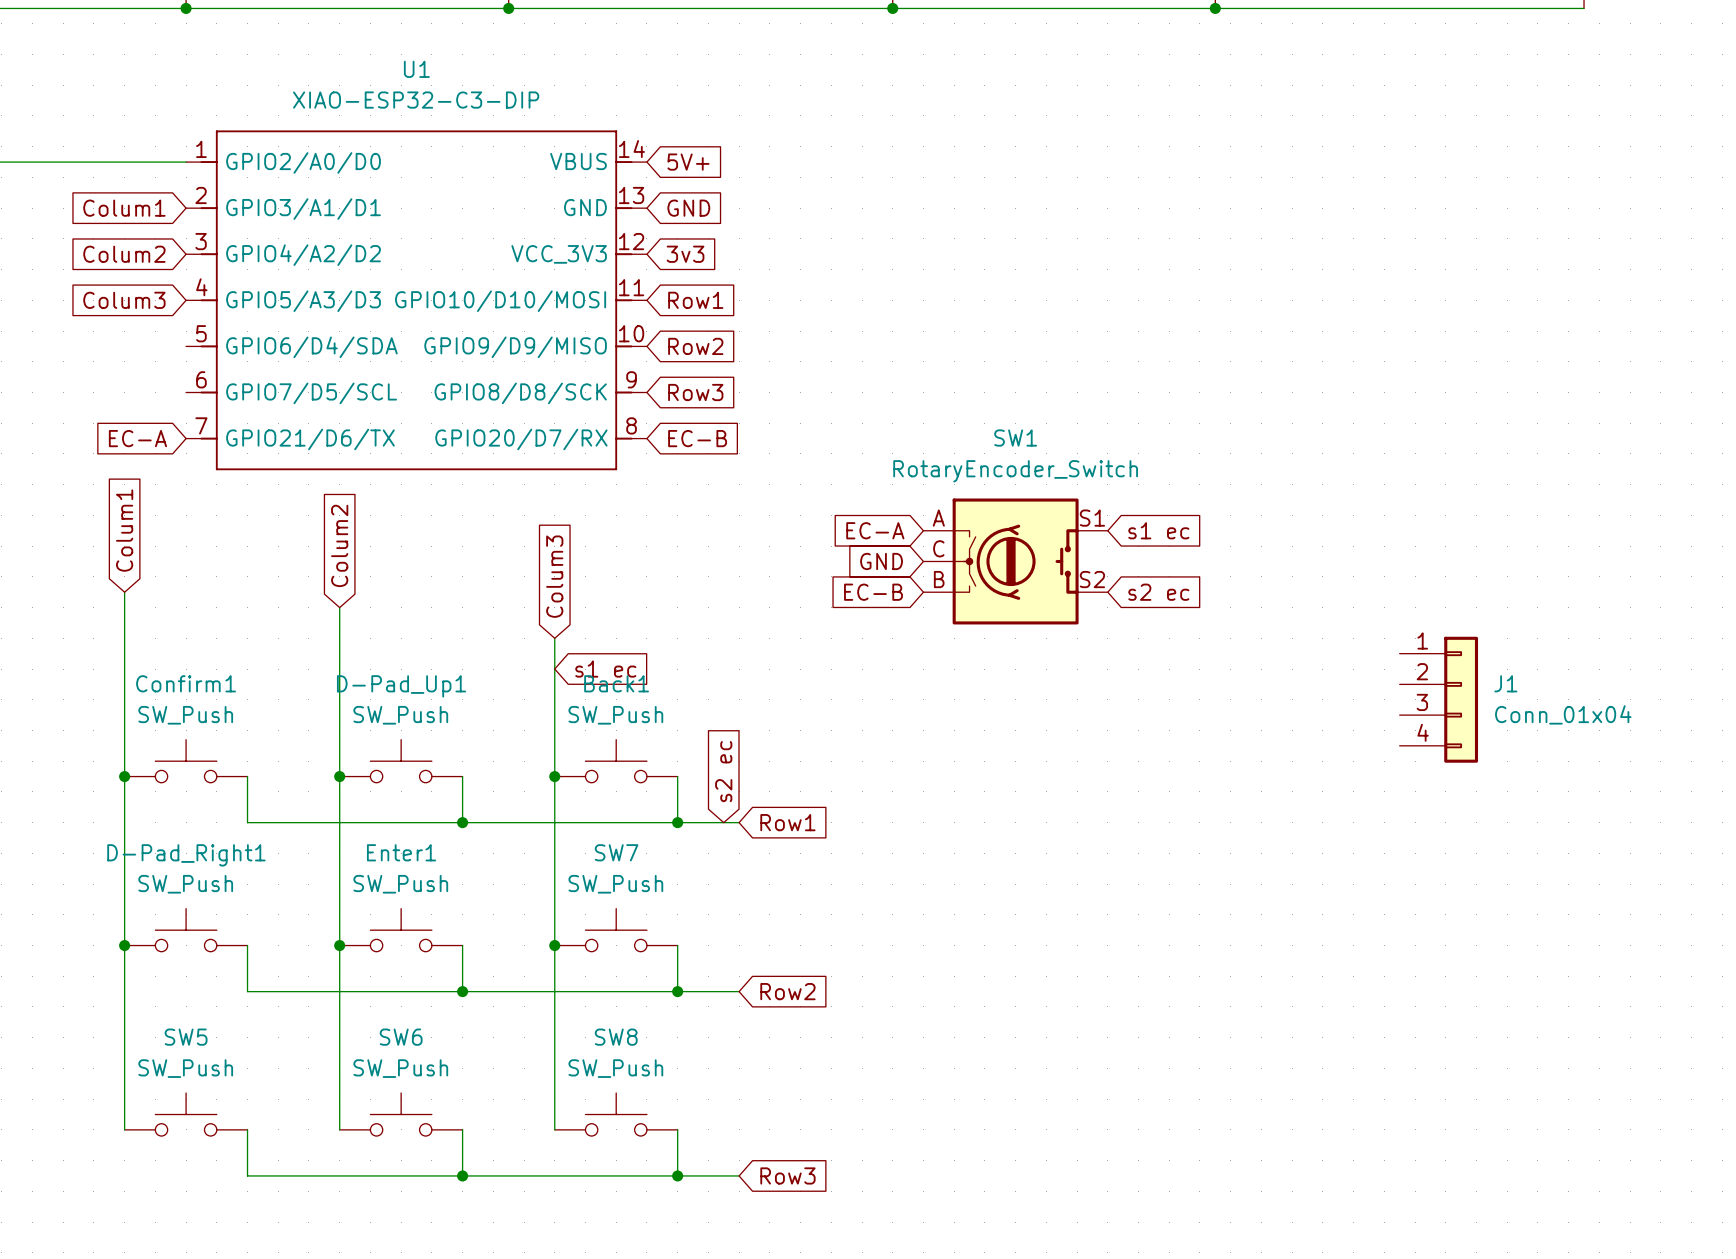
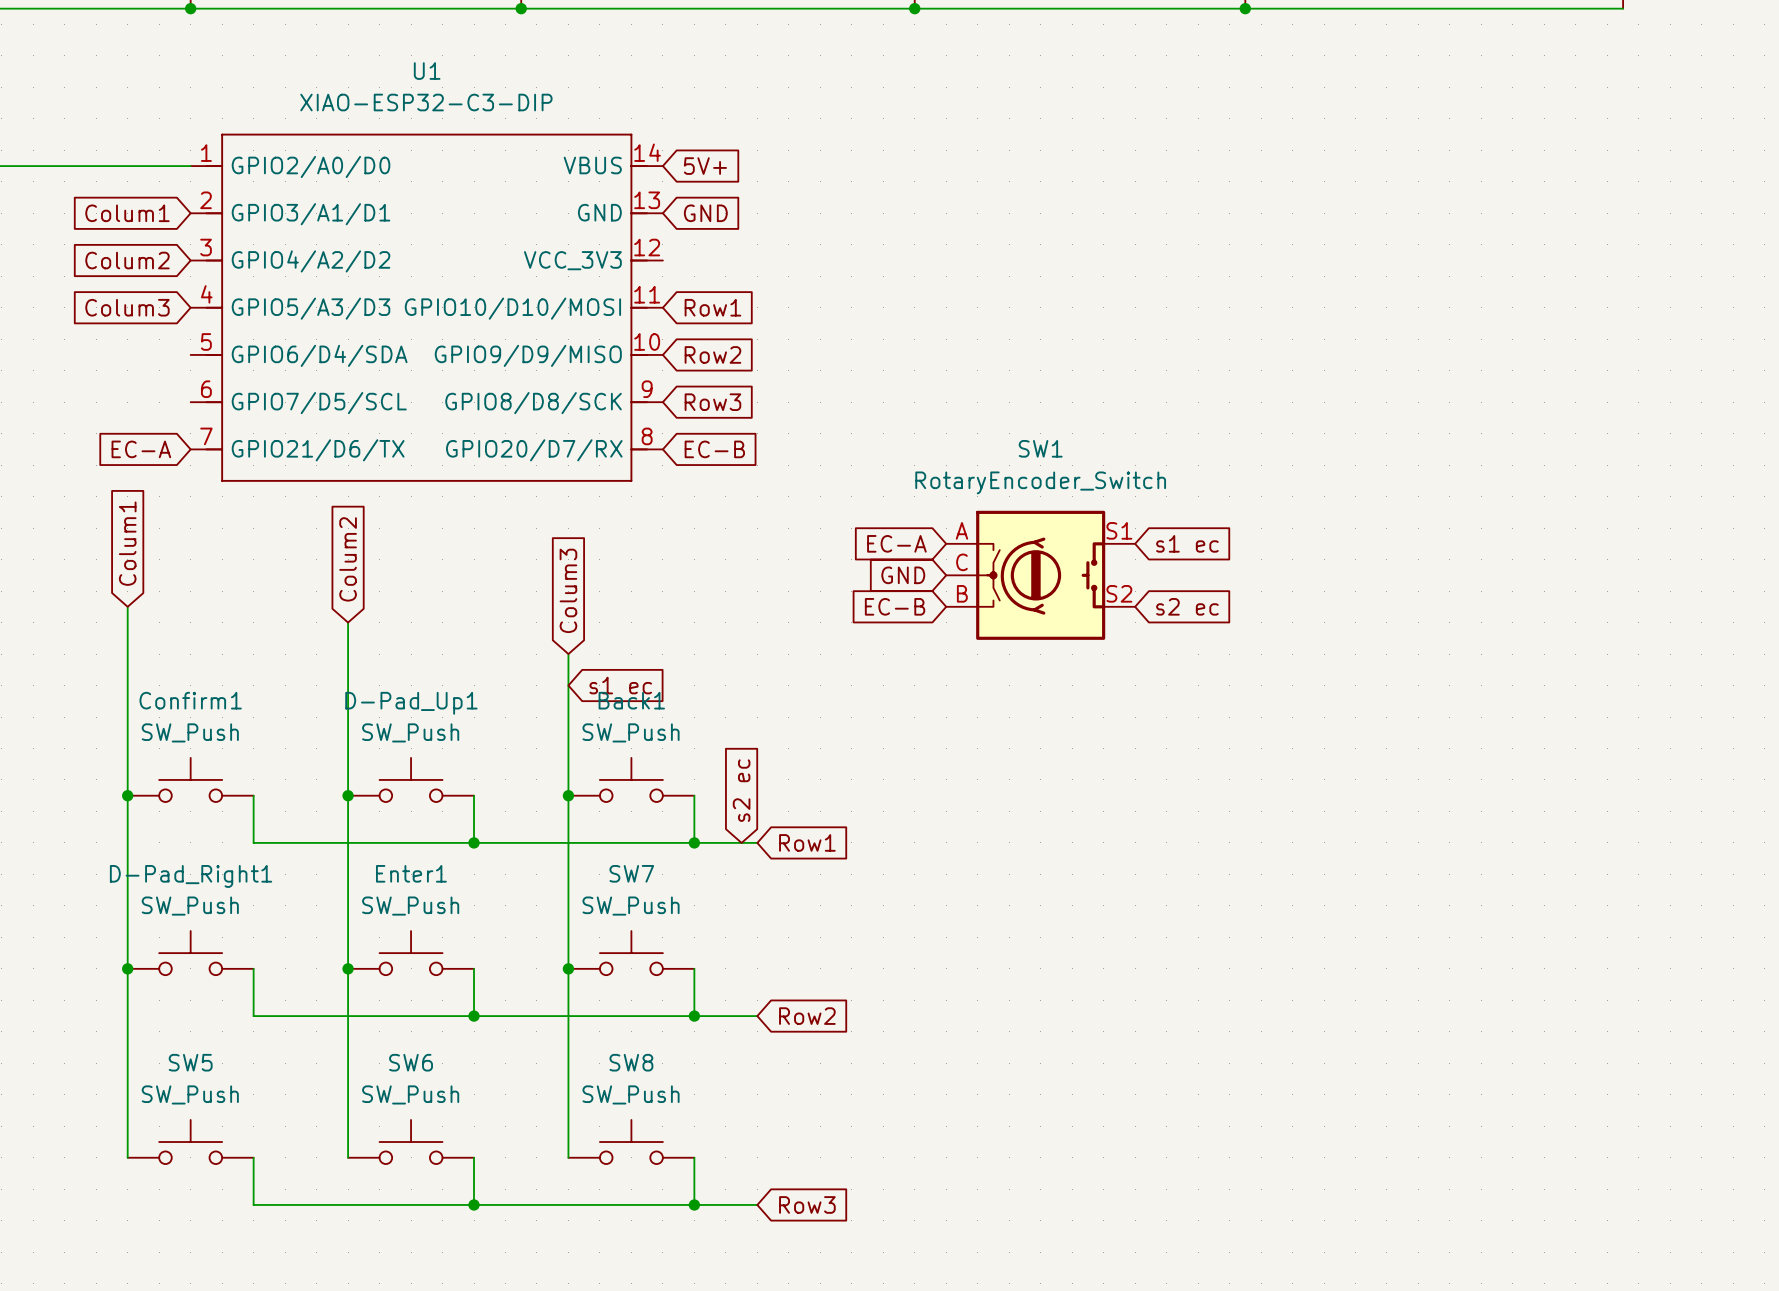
global label: 3v3 (685, 254) -> none
J1: Conn_01x04 (1438, 699) -> none

